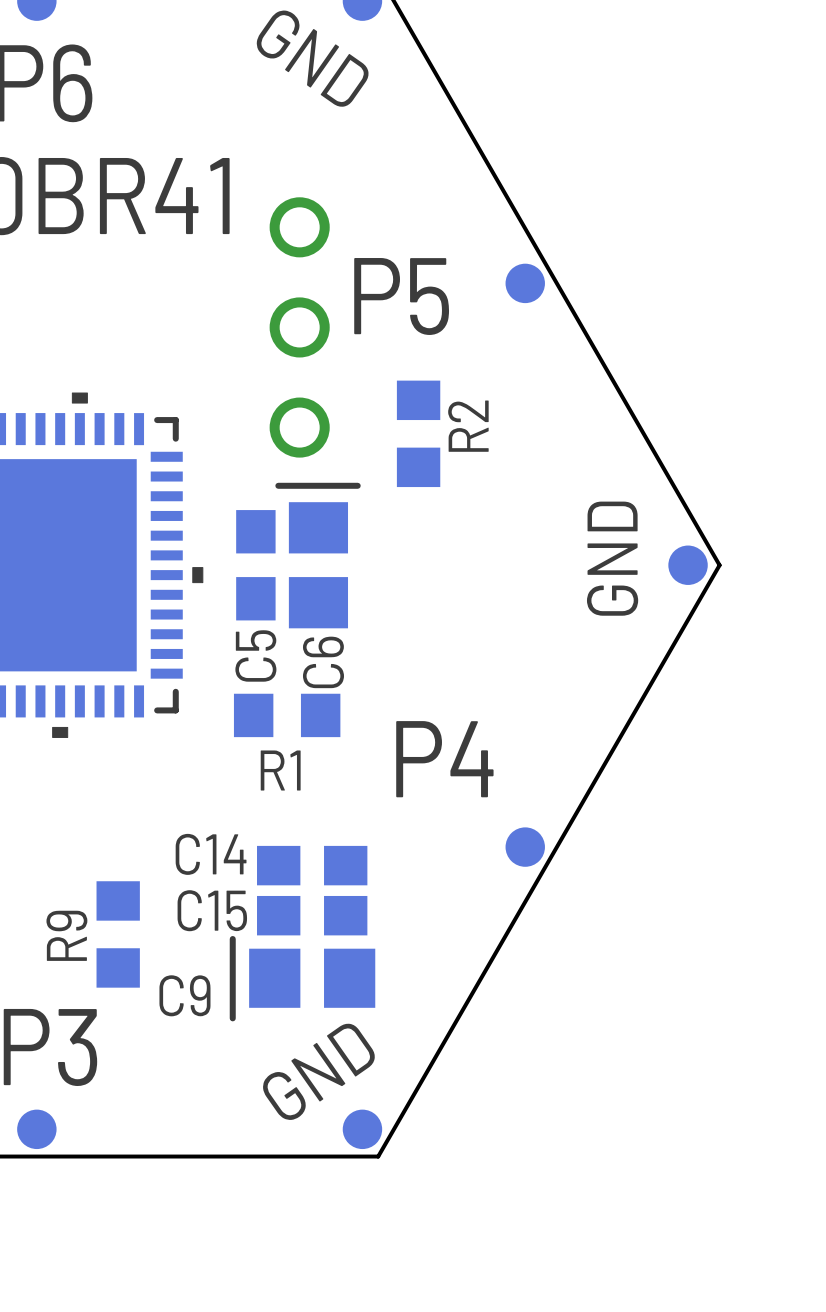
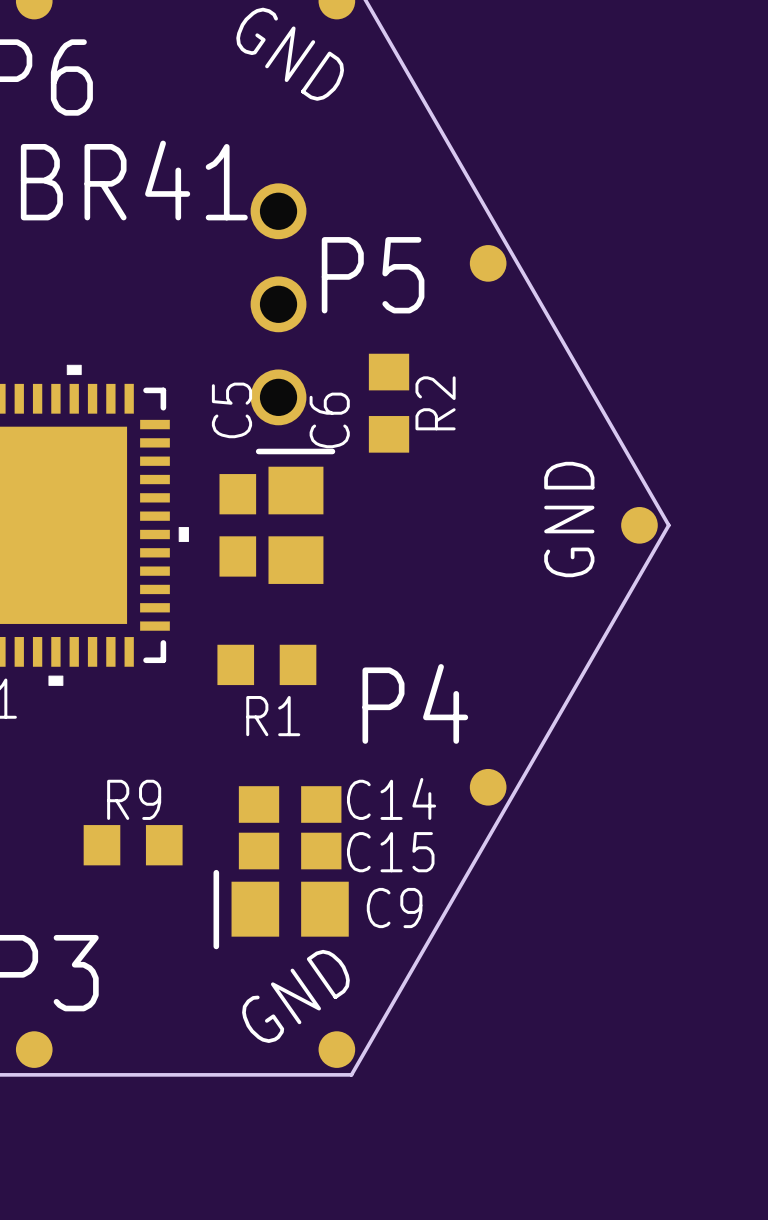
C5 name position: C5 (255, 655) -> C5 (231, 410)
C6 name position: C6 (323, 662) -> C6 (329, 420)
C14 name position: C14 (211, 854) -> C14 (391, 798)
C15 name position: C15 (212, 910) -> C15 (390, 852)
R9 rotation: 0° (118, 934) -> 90° clockwise (133, 845)
C9 name position: C9 (184, 995) -> C9 (394, 908)

